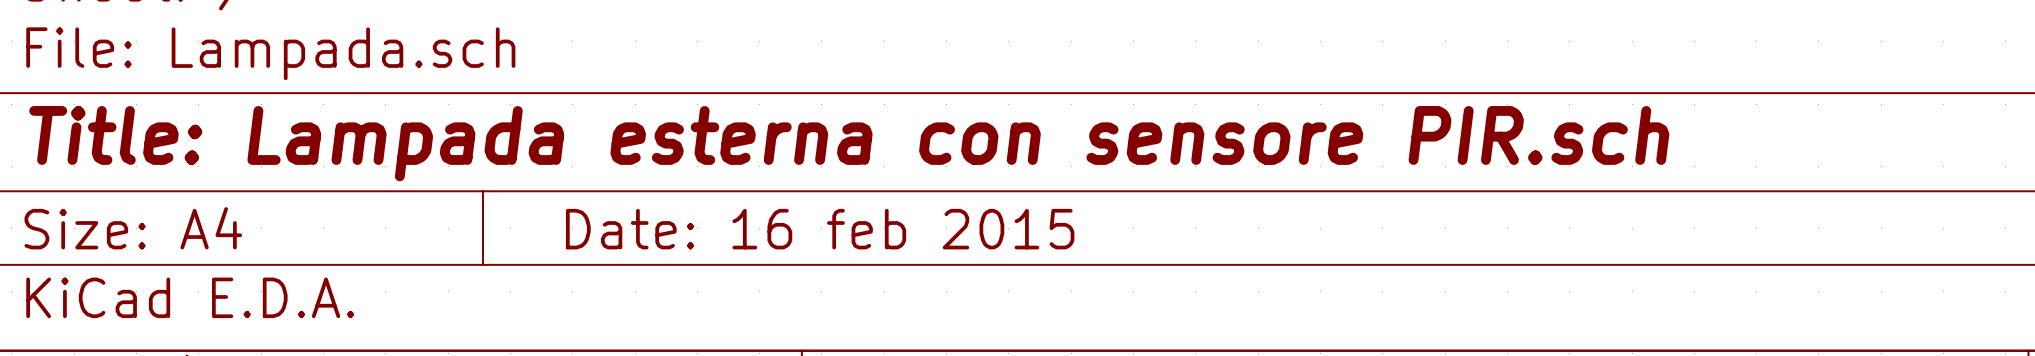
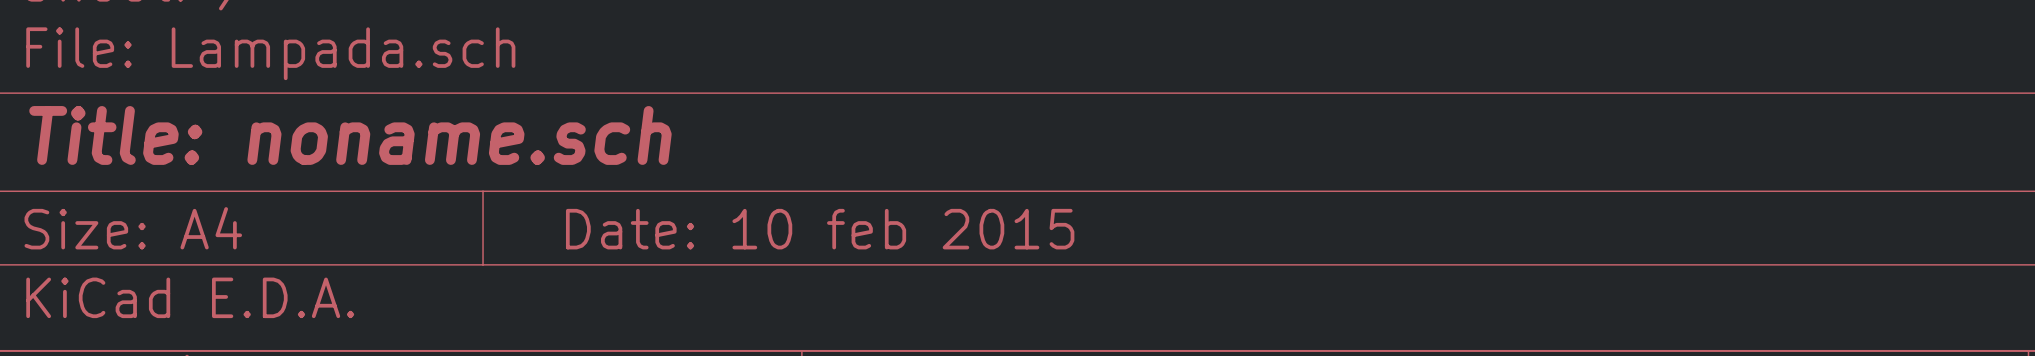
title block: Title: Lampada esterna con sensore PIR.sch (849, 143) -> Title: noname.sch (350, 135)
title block: Date: 16 feb 2015 (820, 229) -> Date: 10 feb 2015 (820, 229)

